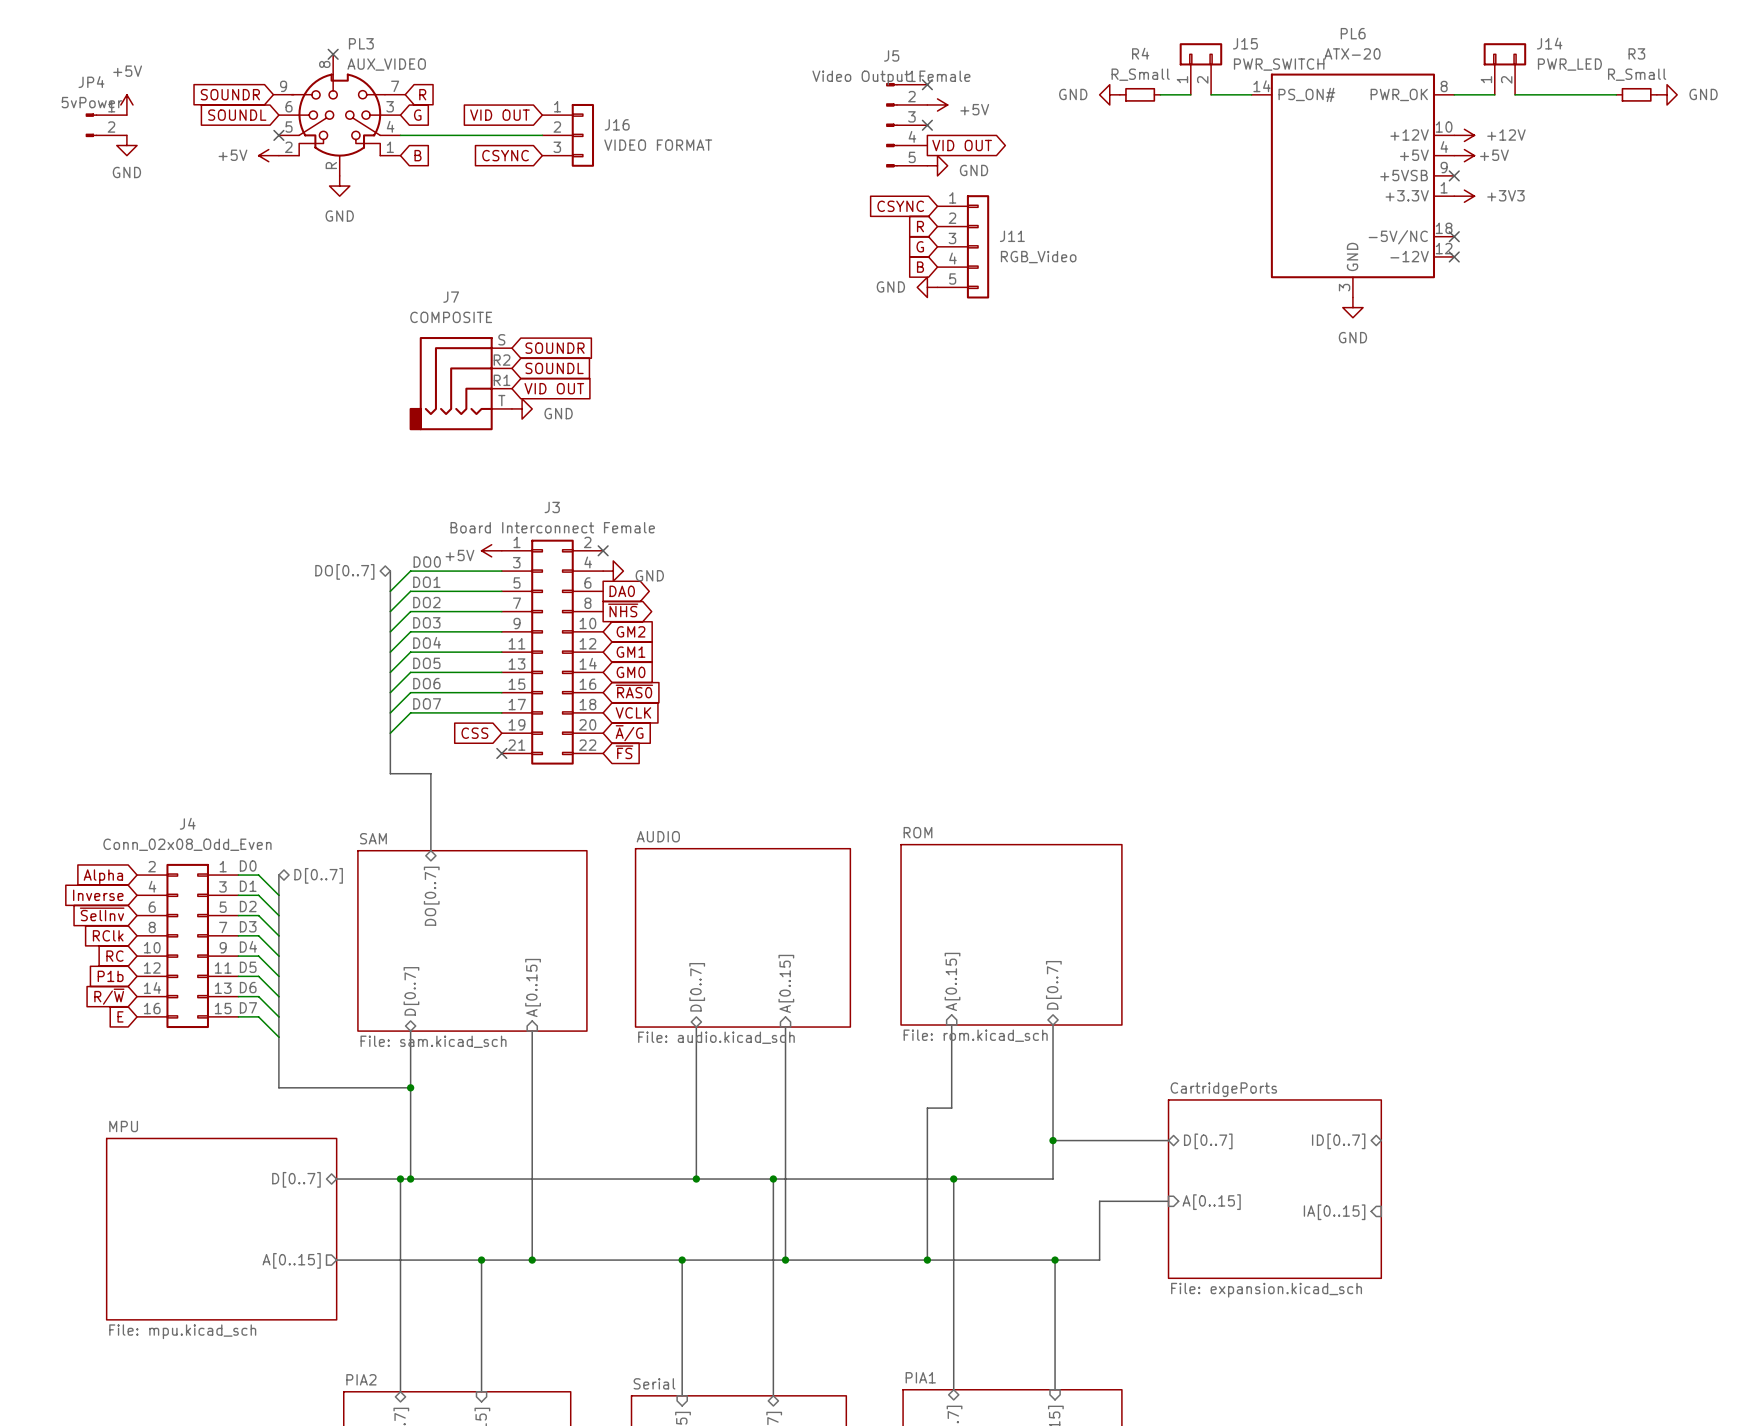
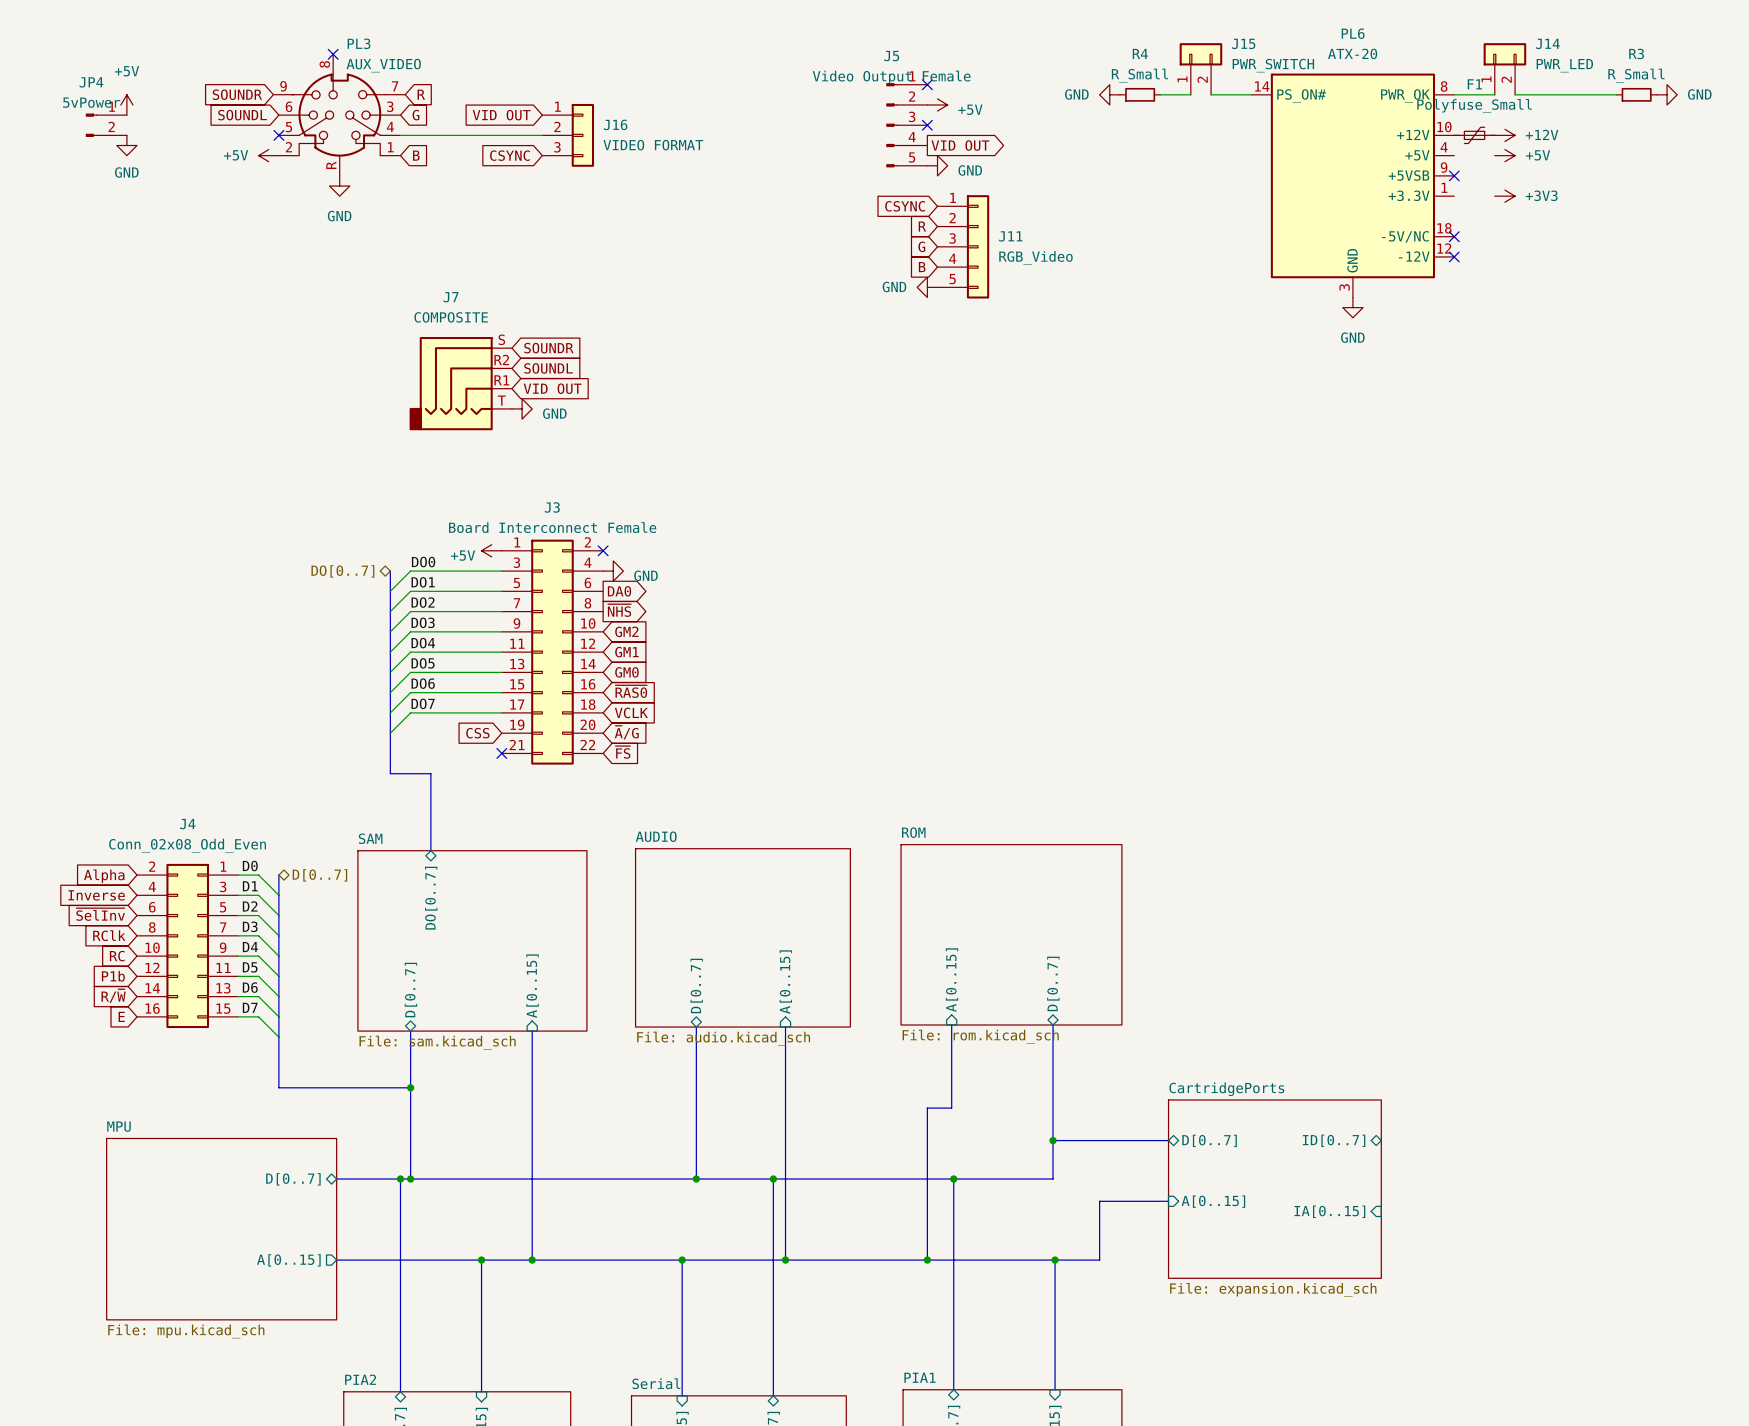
power symbol position: +12V (1464, 135) -> +12V (1504, 135)
F1: none -> Polyfuse_Small (1474, 135)
power symbol position: +5V (1464, 155) -> +5V (1504, 155)
power symbol position: +3V3 (1464, 196) -> +3V3 (1504, 196)

